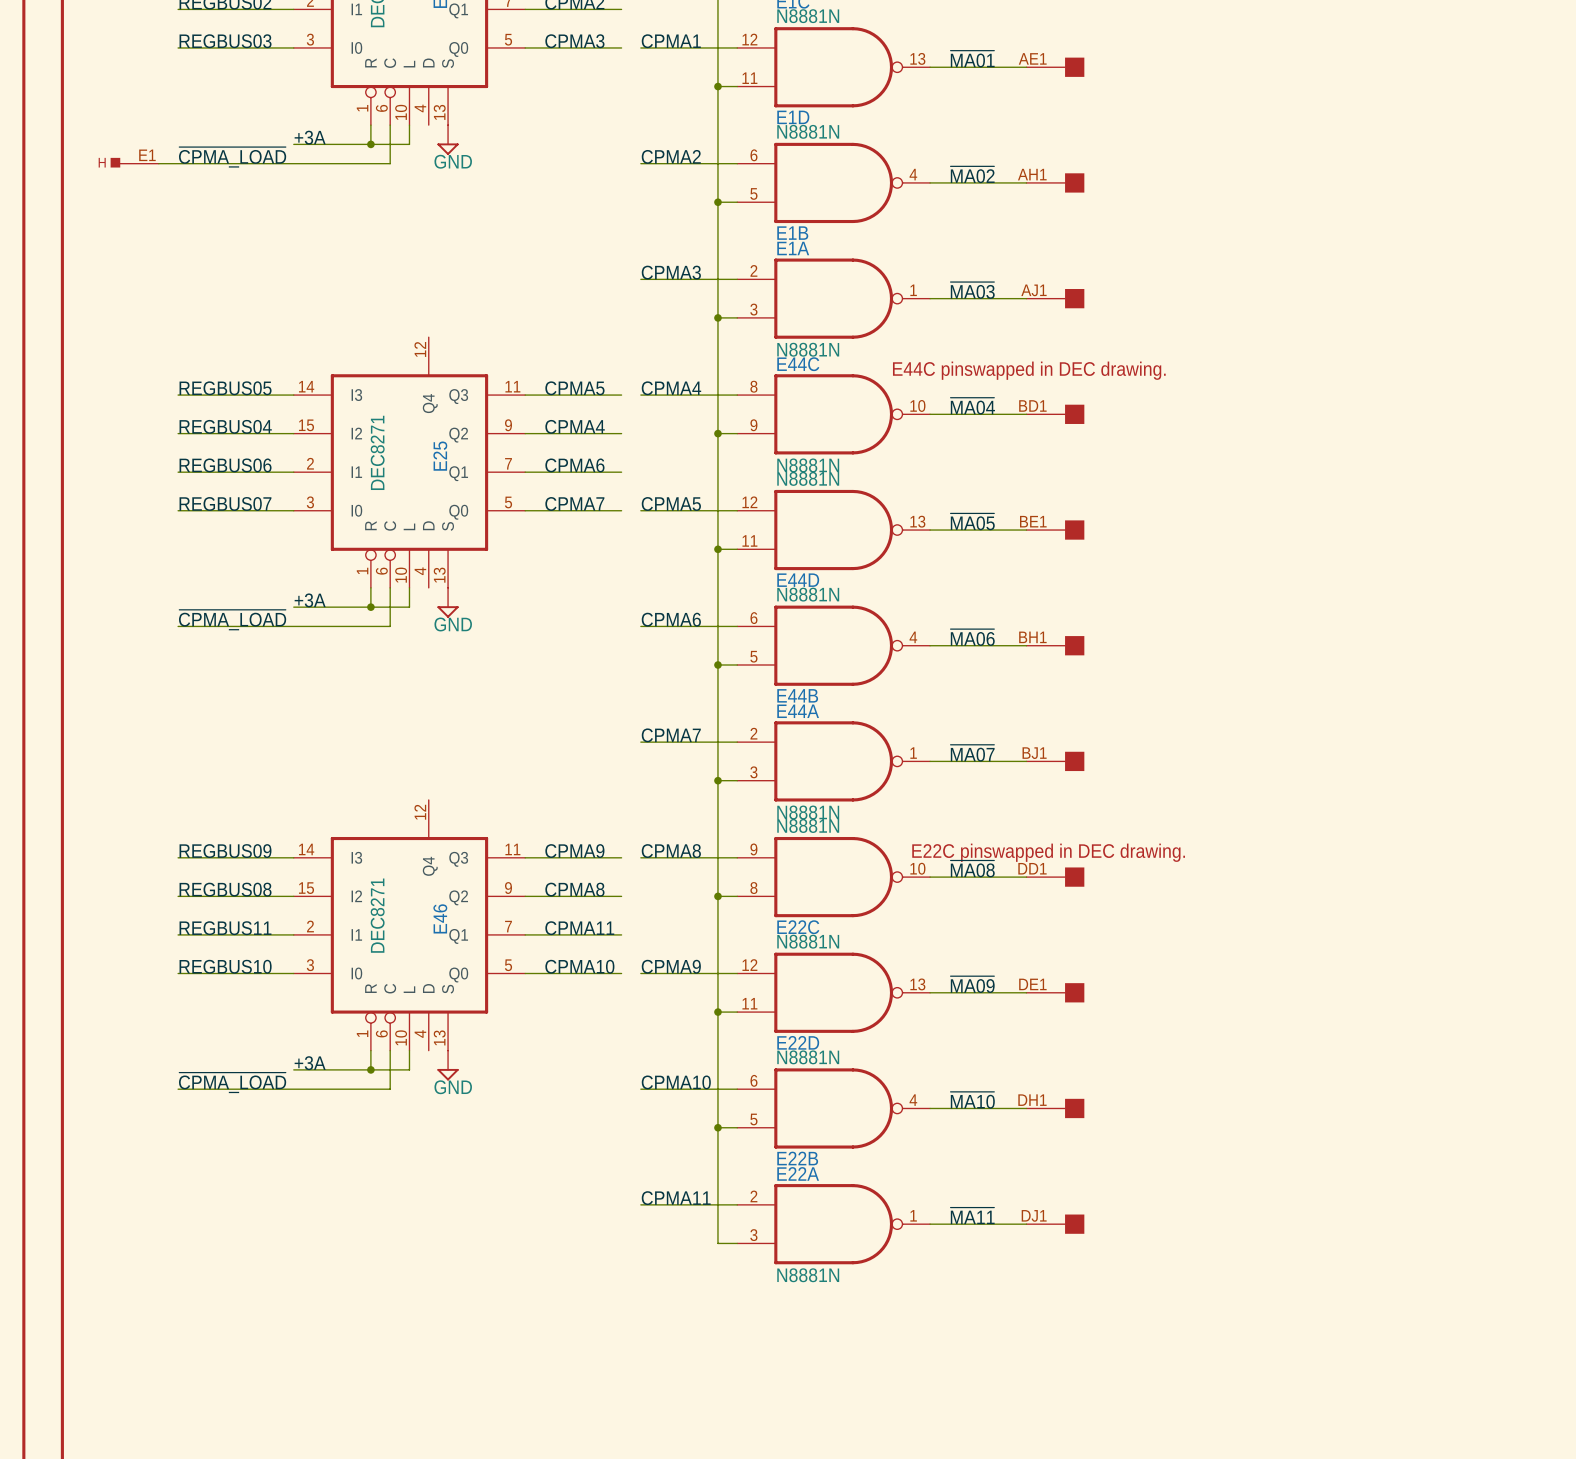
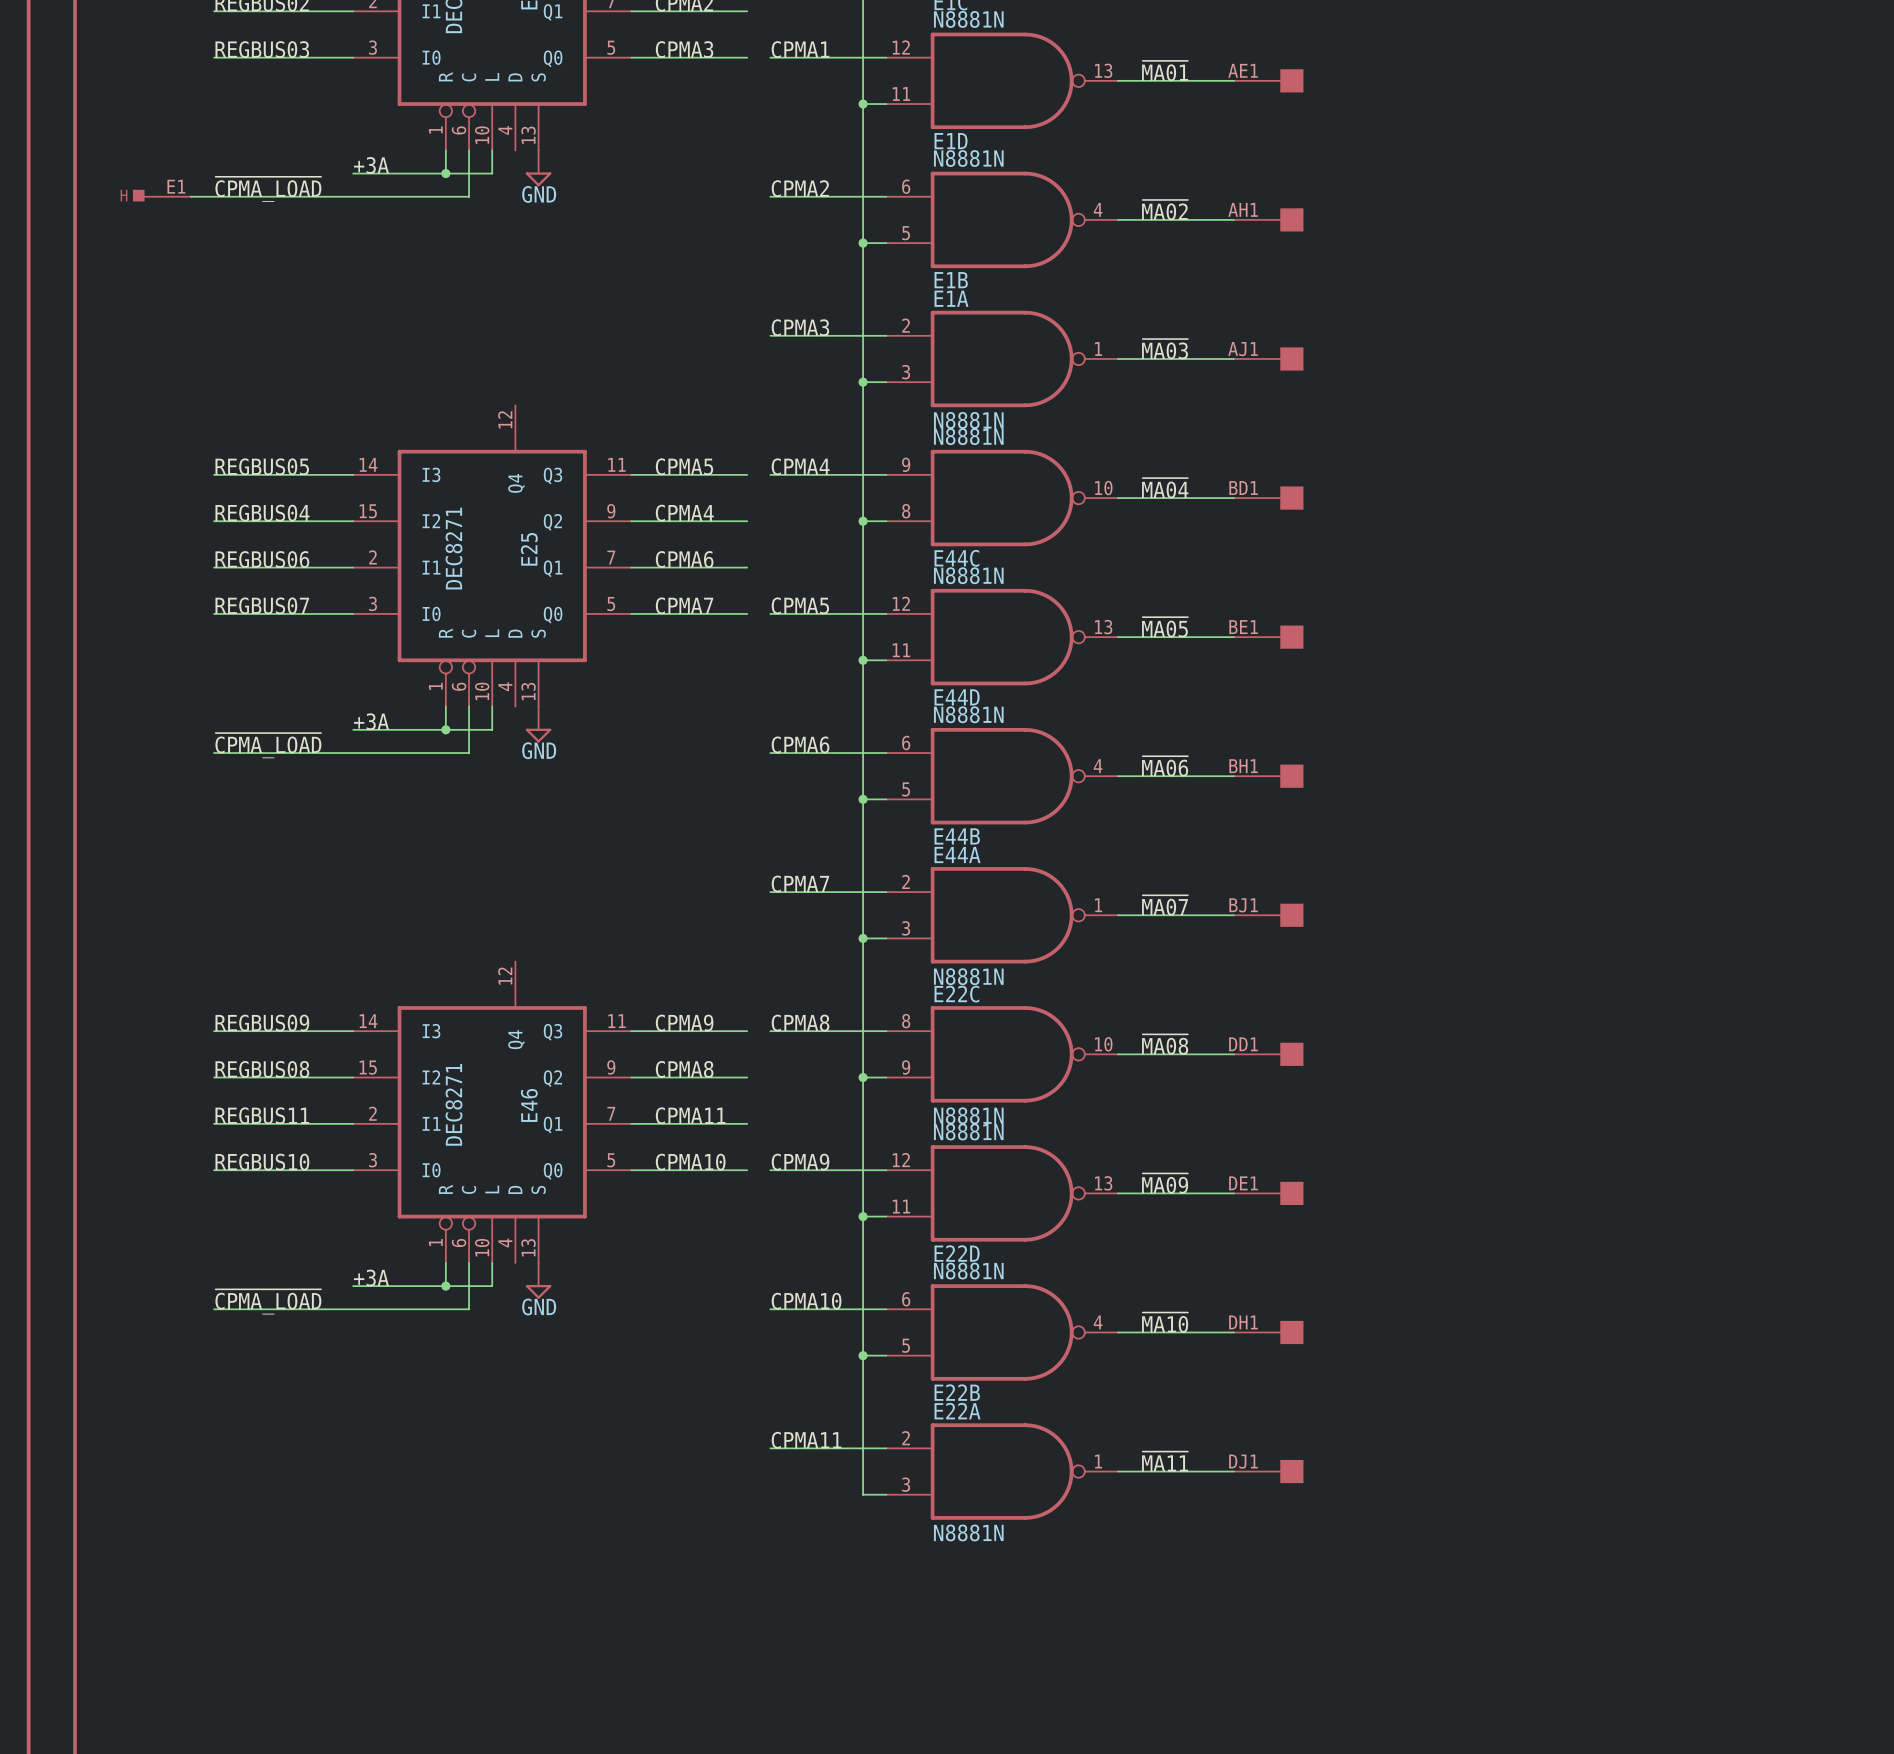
text: E44C pinswapped in DEC drawing. (1029, 370) -> none
E44C flip: as is (833, 414) -> up-down (1002, 498)
text: E22C pinswapped in DEC drawing. (1048, 852) -> none
E22C flip: as is (833, 877) -> up-down (1002, 1054)

